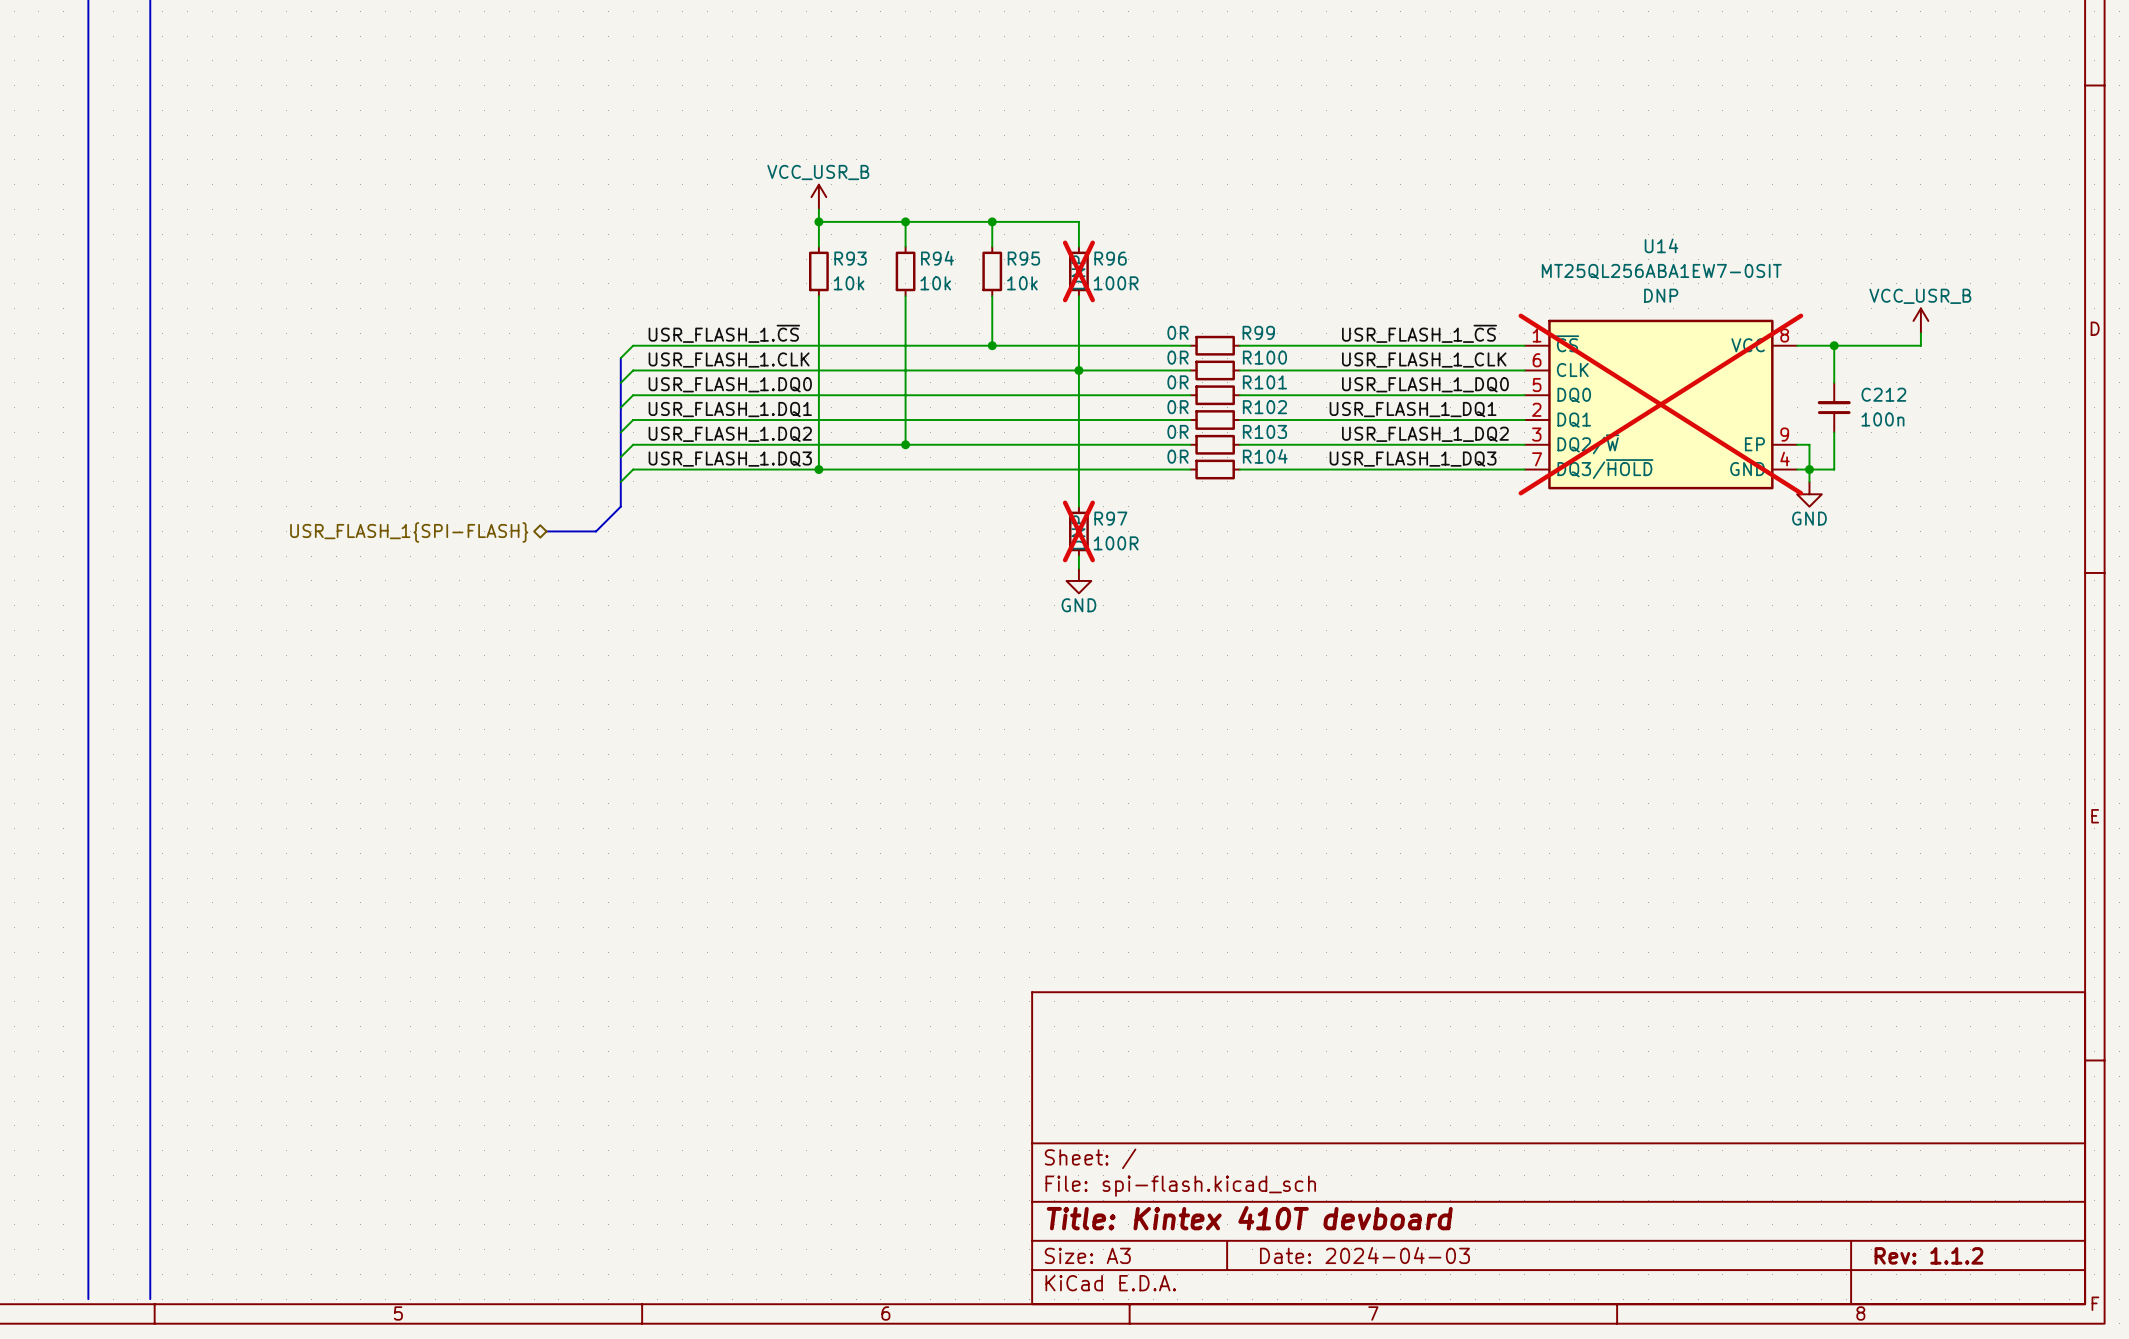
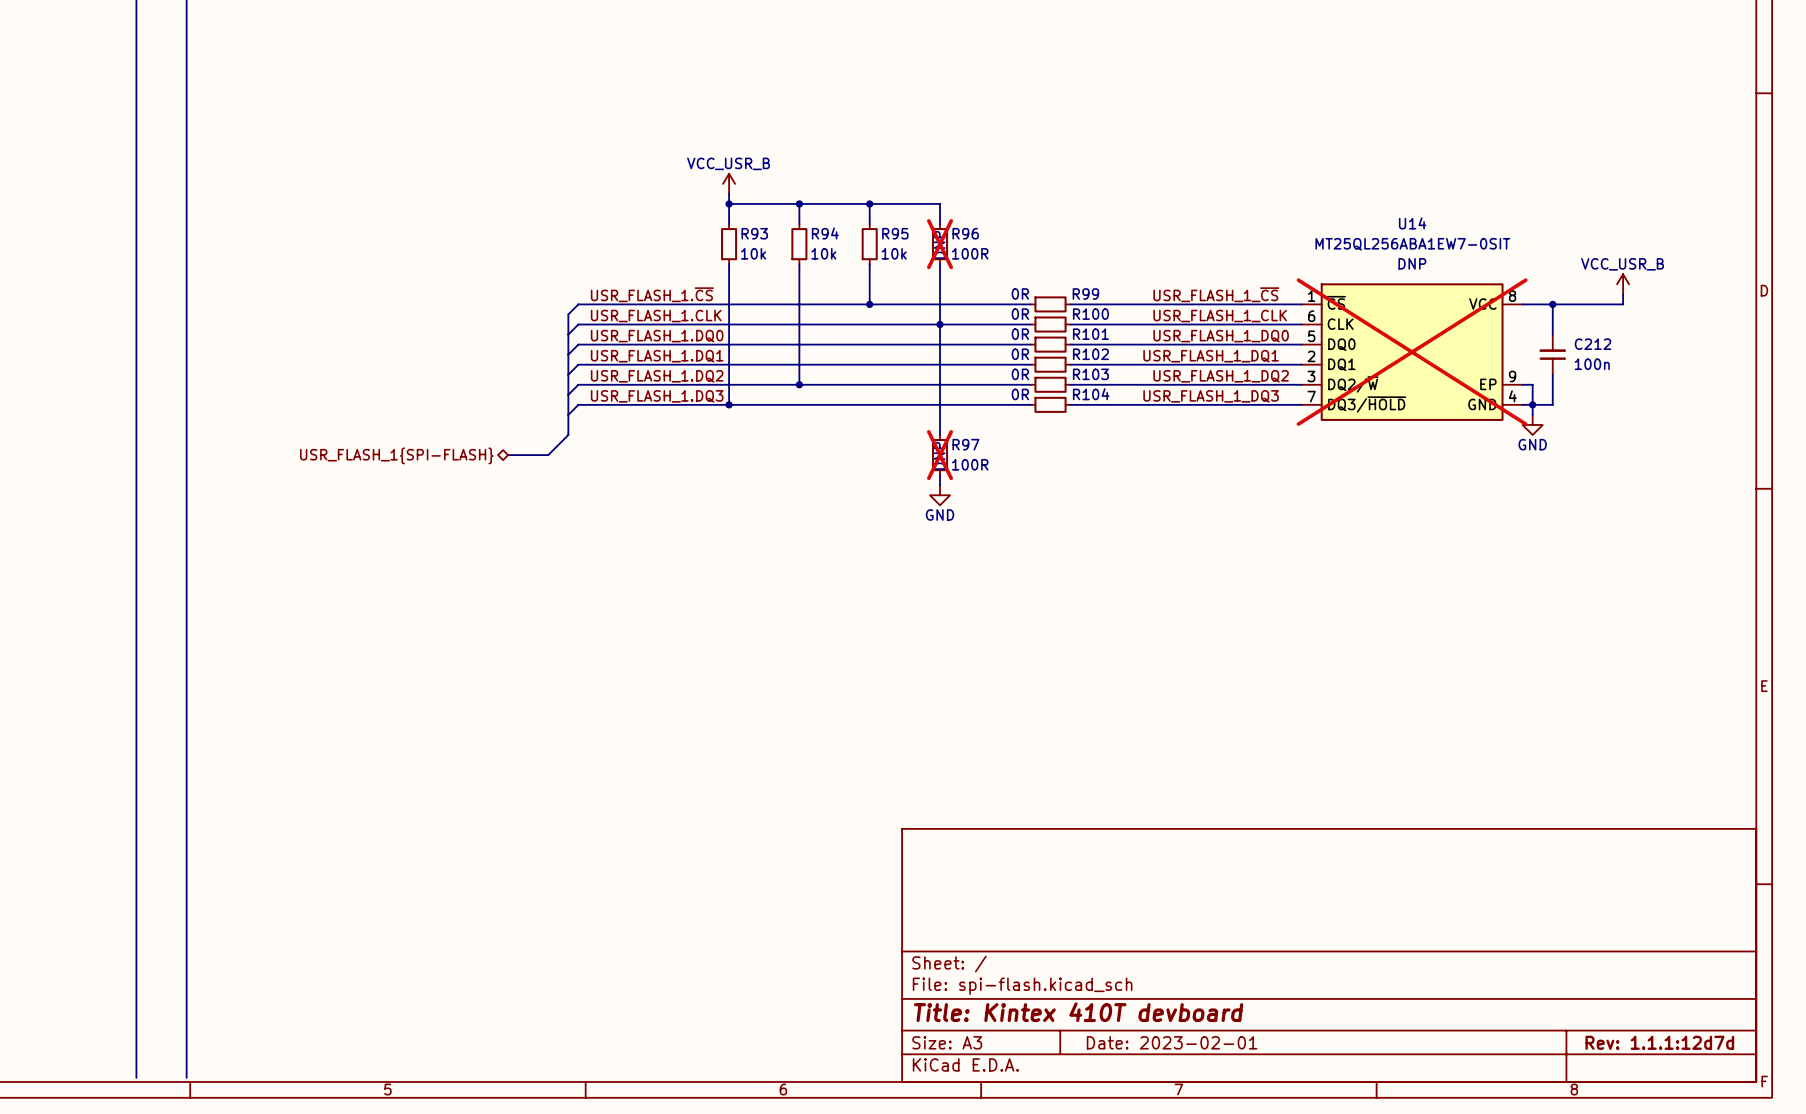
title block: Date: 2024-04-03 (1364, 1255) -> Date: 2023-02-01 (1172, 1042)
title block: Rev: 1.1.2 (1928, 1255) -> Rev: 1.1.1:12d7d (1659, 1042)

